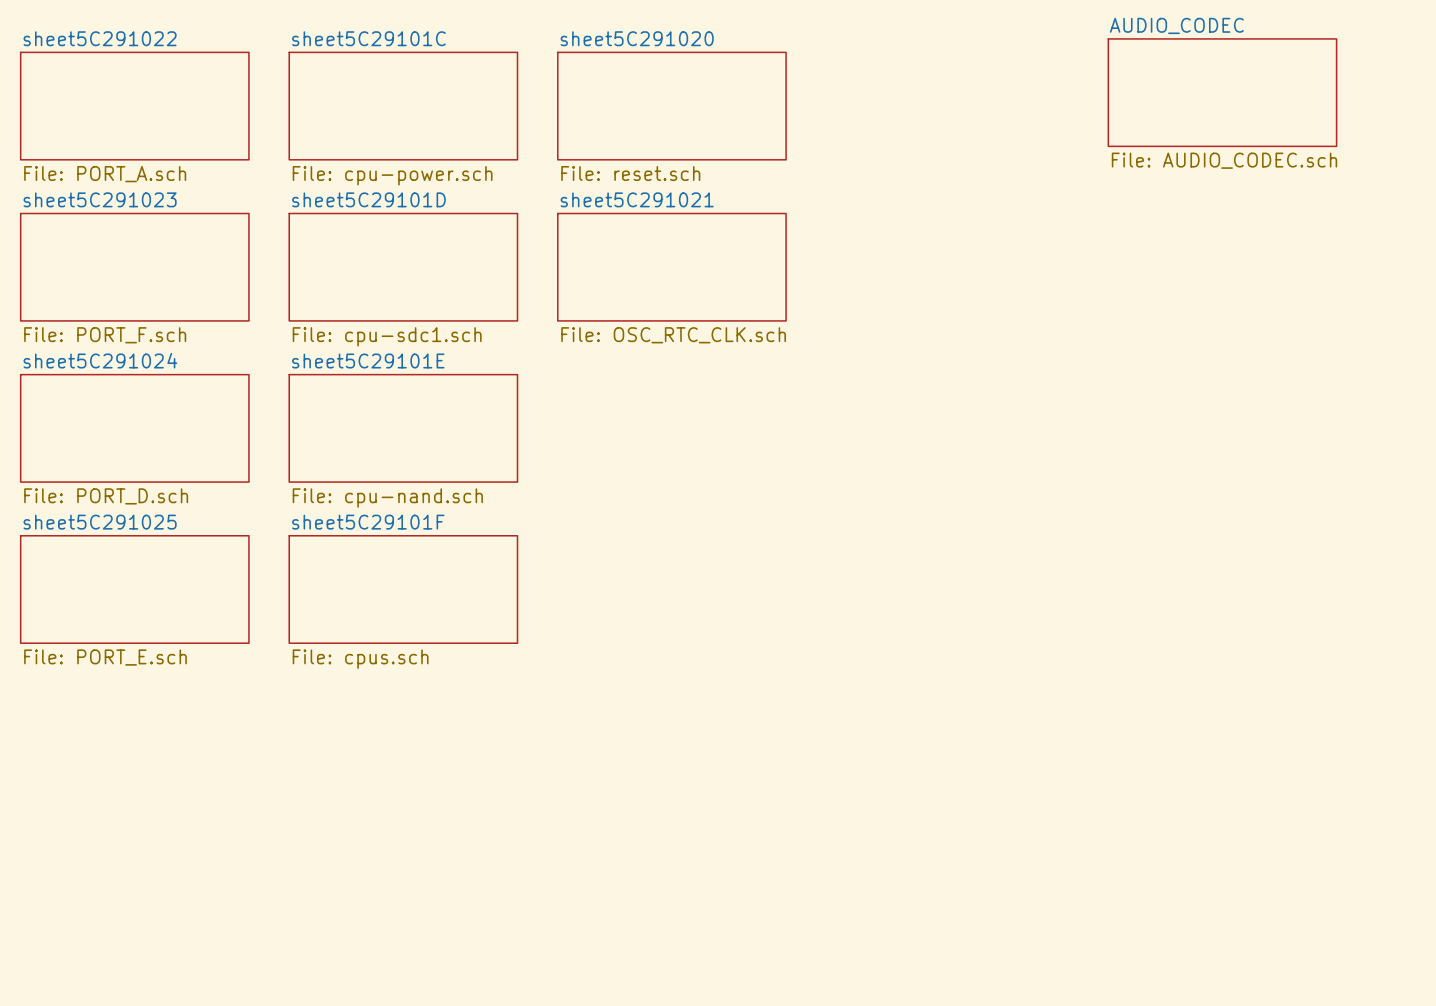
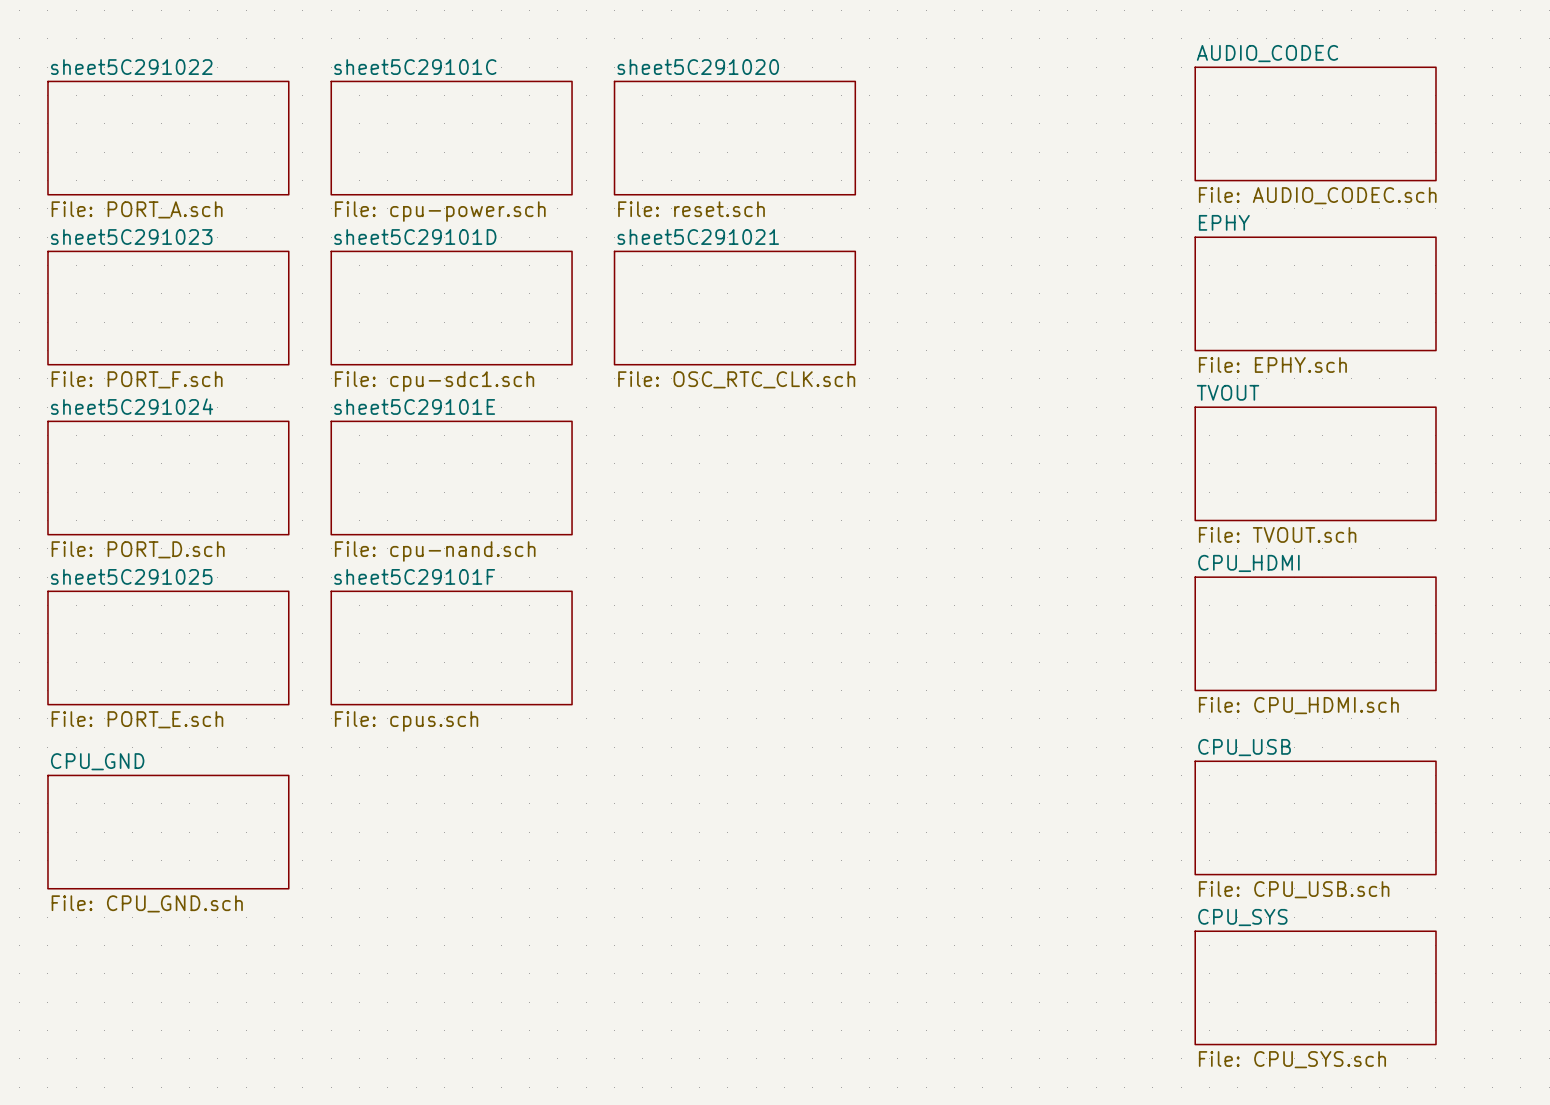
sheet EPHY: none -> File: EPHY.sch (1315, 293)
sheet TVOUT: none -> File: TVOUT.sch (1315, 463)
sheet CPU_HDMI: none -> File: CPU_HDMI.sch (1315, 633)
sheet CPU_USB: none -> File: CPU_USB.sch (1315, 817)
sheet CPU_GND: none -> File: CPU_GND.sch (168, 832)
sheet CPU_SYS: none -> File: CPU_SYS.sch (1315, 987)

